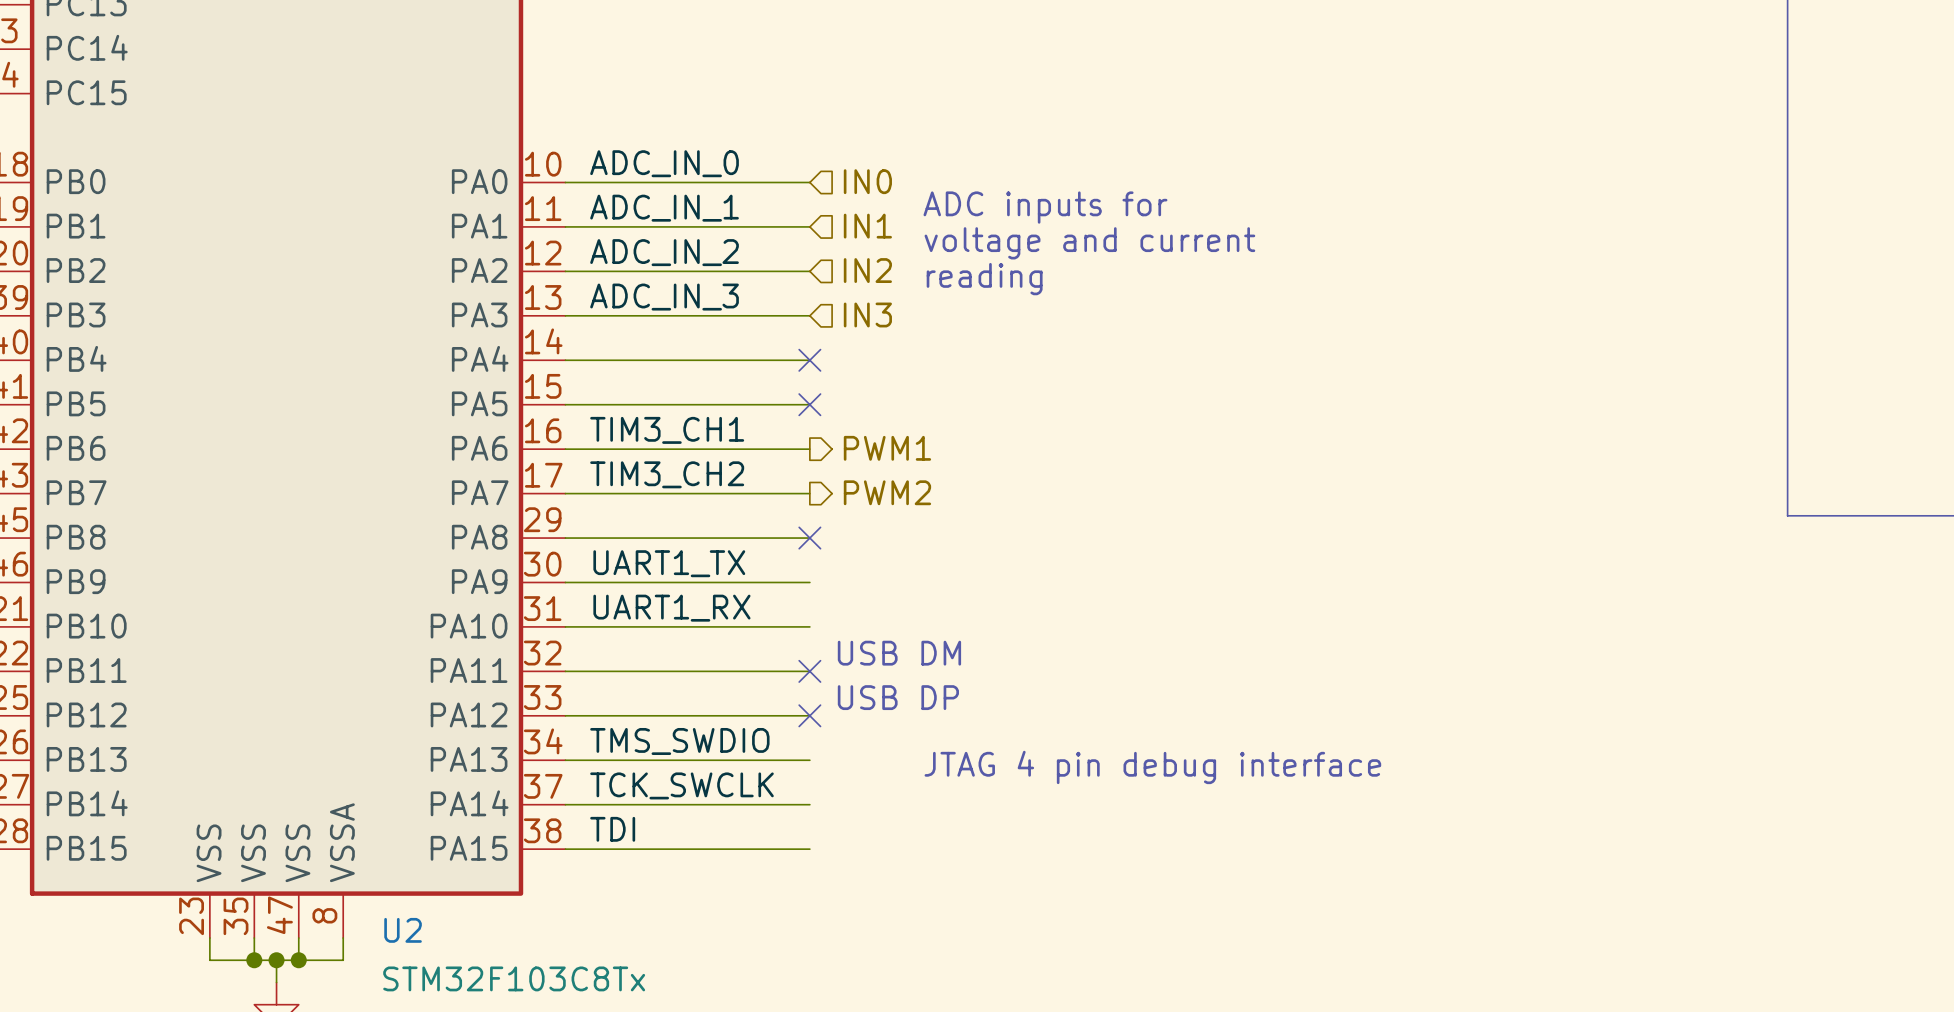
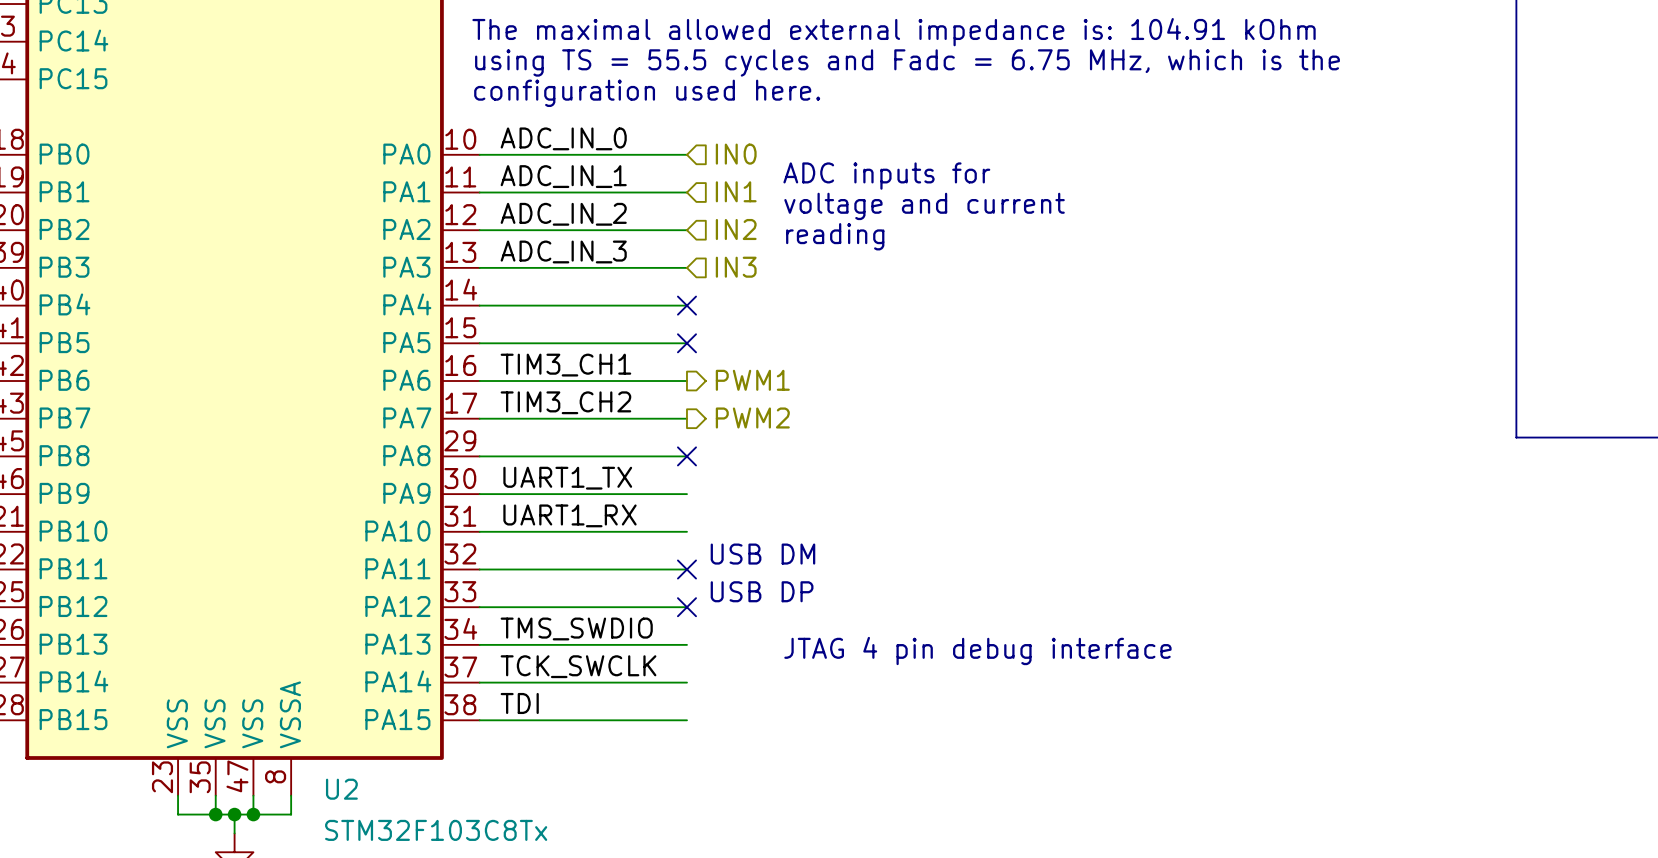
text: none -> The maximal allowed external impedance is: 104.91 kOhm (894, 32)
text: none -> using TS = 55.5 cycles and Fadc = 6.75 MHz, which is the (907, 62)
text: none -> configuration used here. (647, 93)

